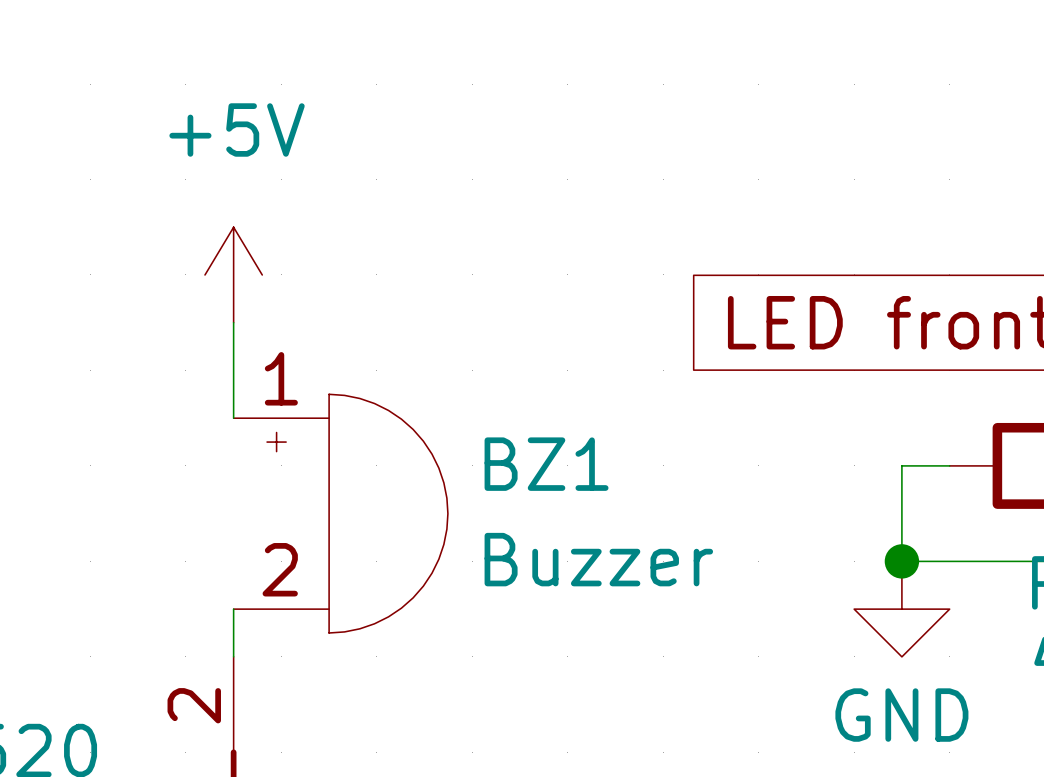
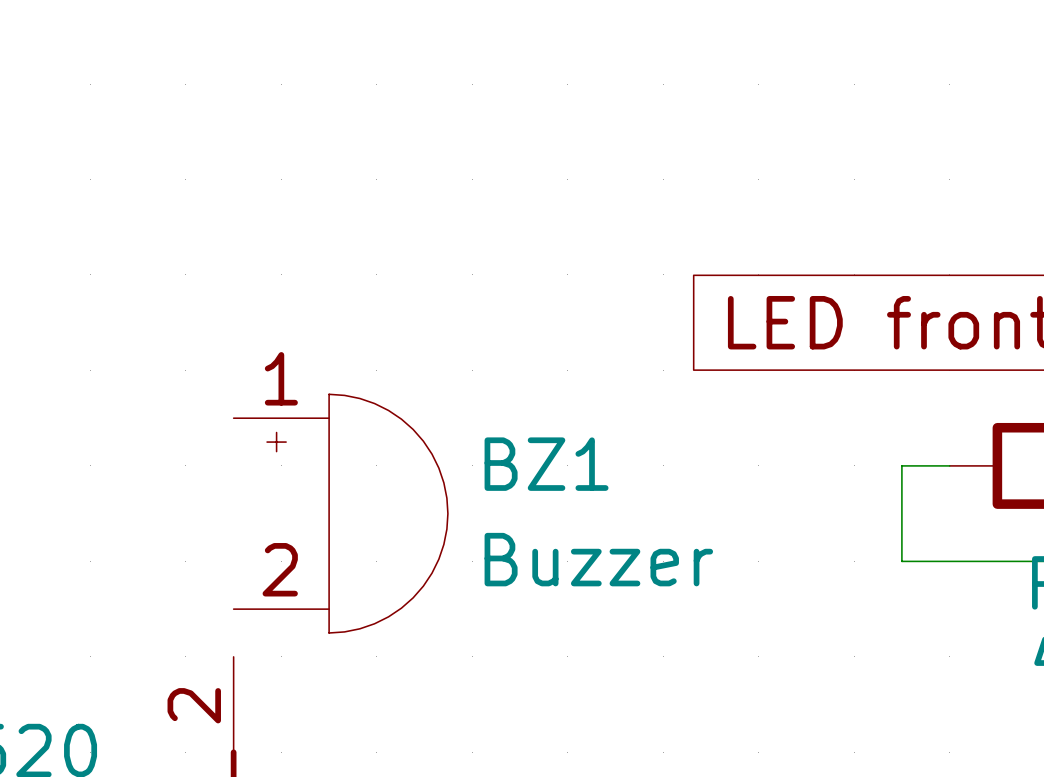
power symbol: +5V (233, 274) -> none
wire: (233, 322) (233, 418) -> none
junction: (901, 561) -> none
wire: (233, 609) (233, 656) -> none
power symbol: GND (901, 609) -> none

